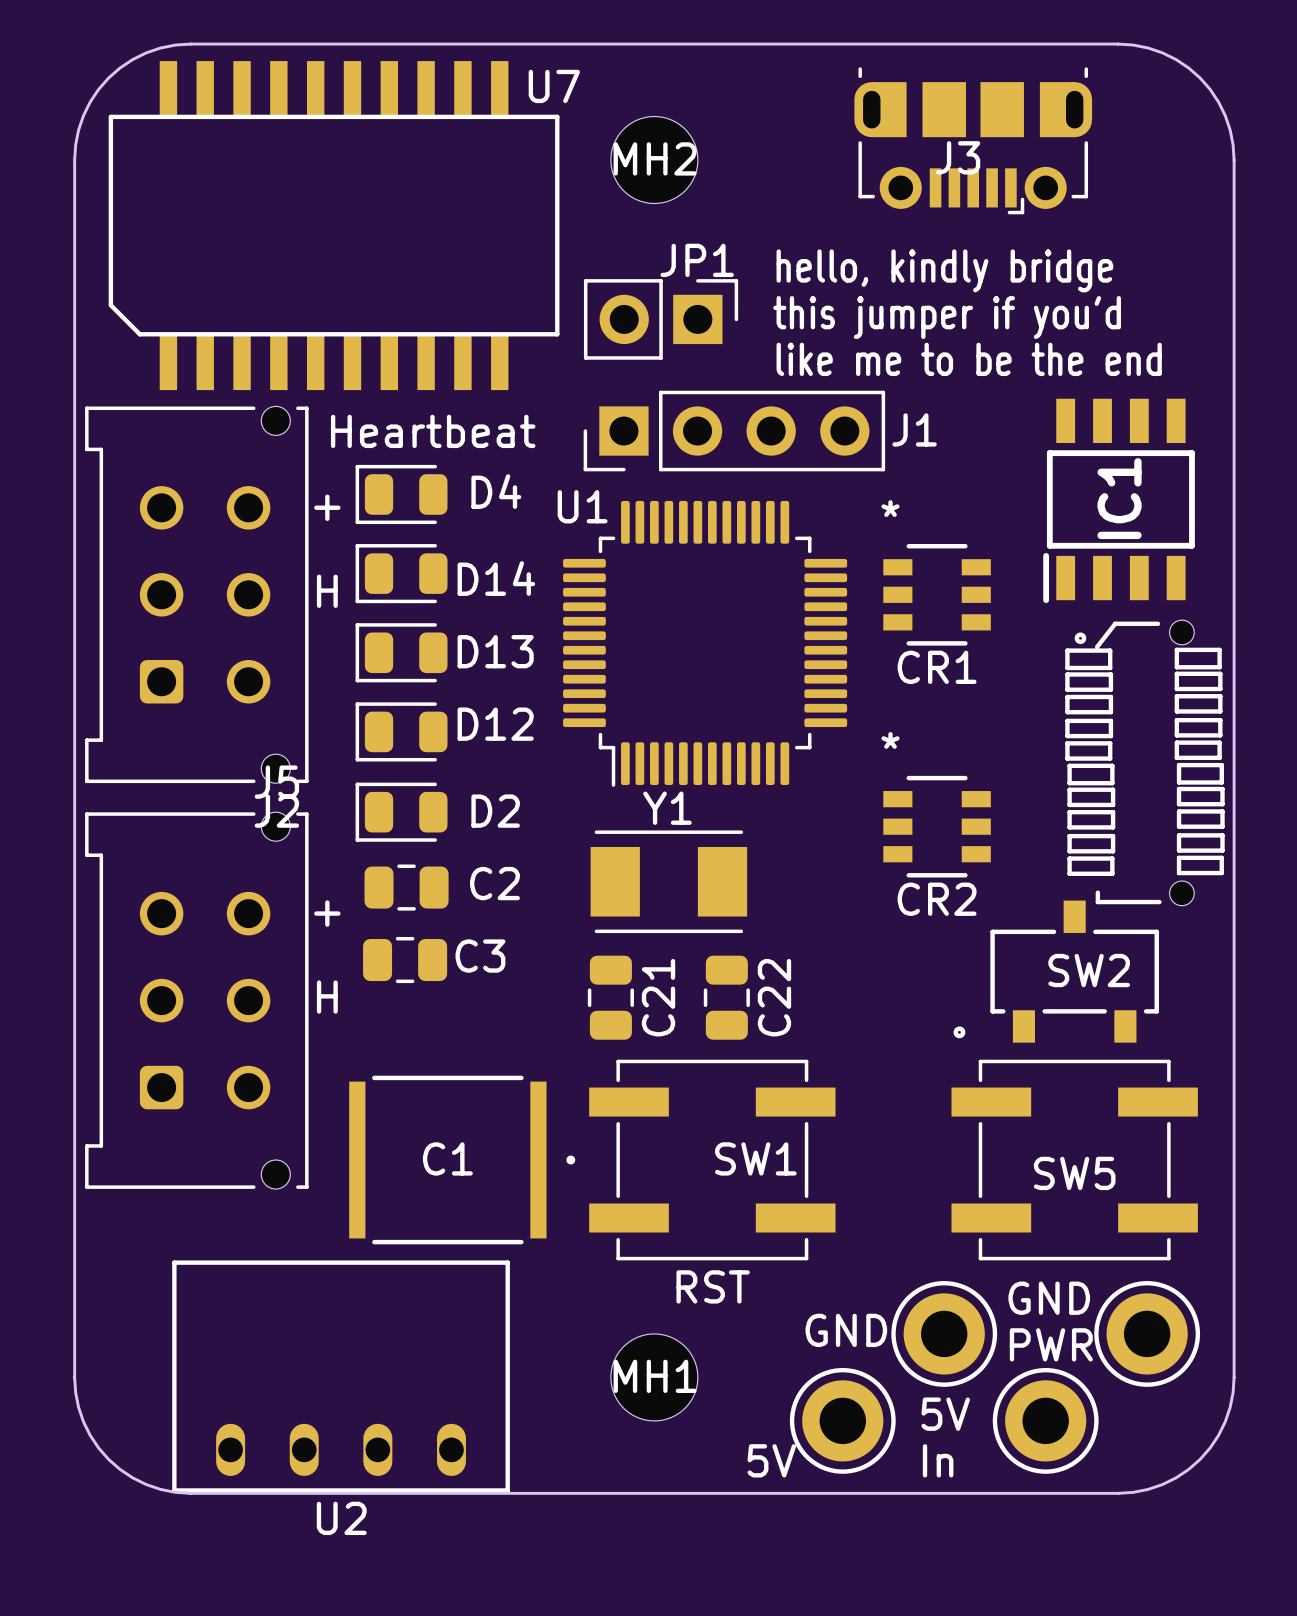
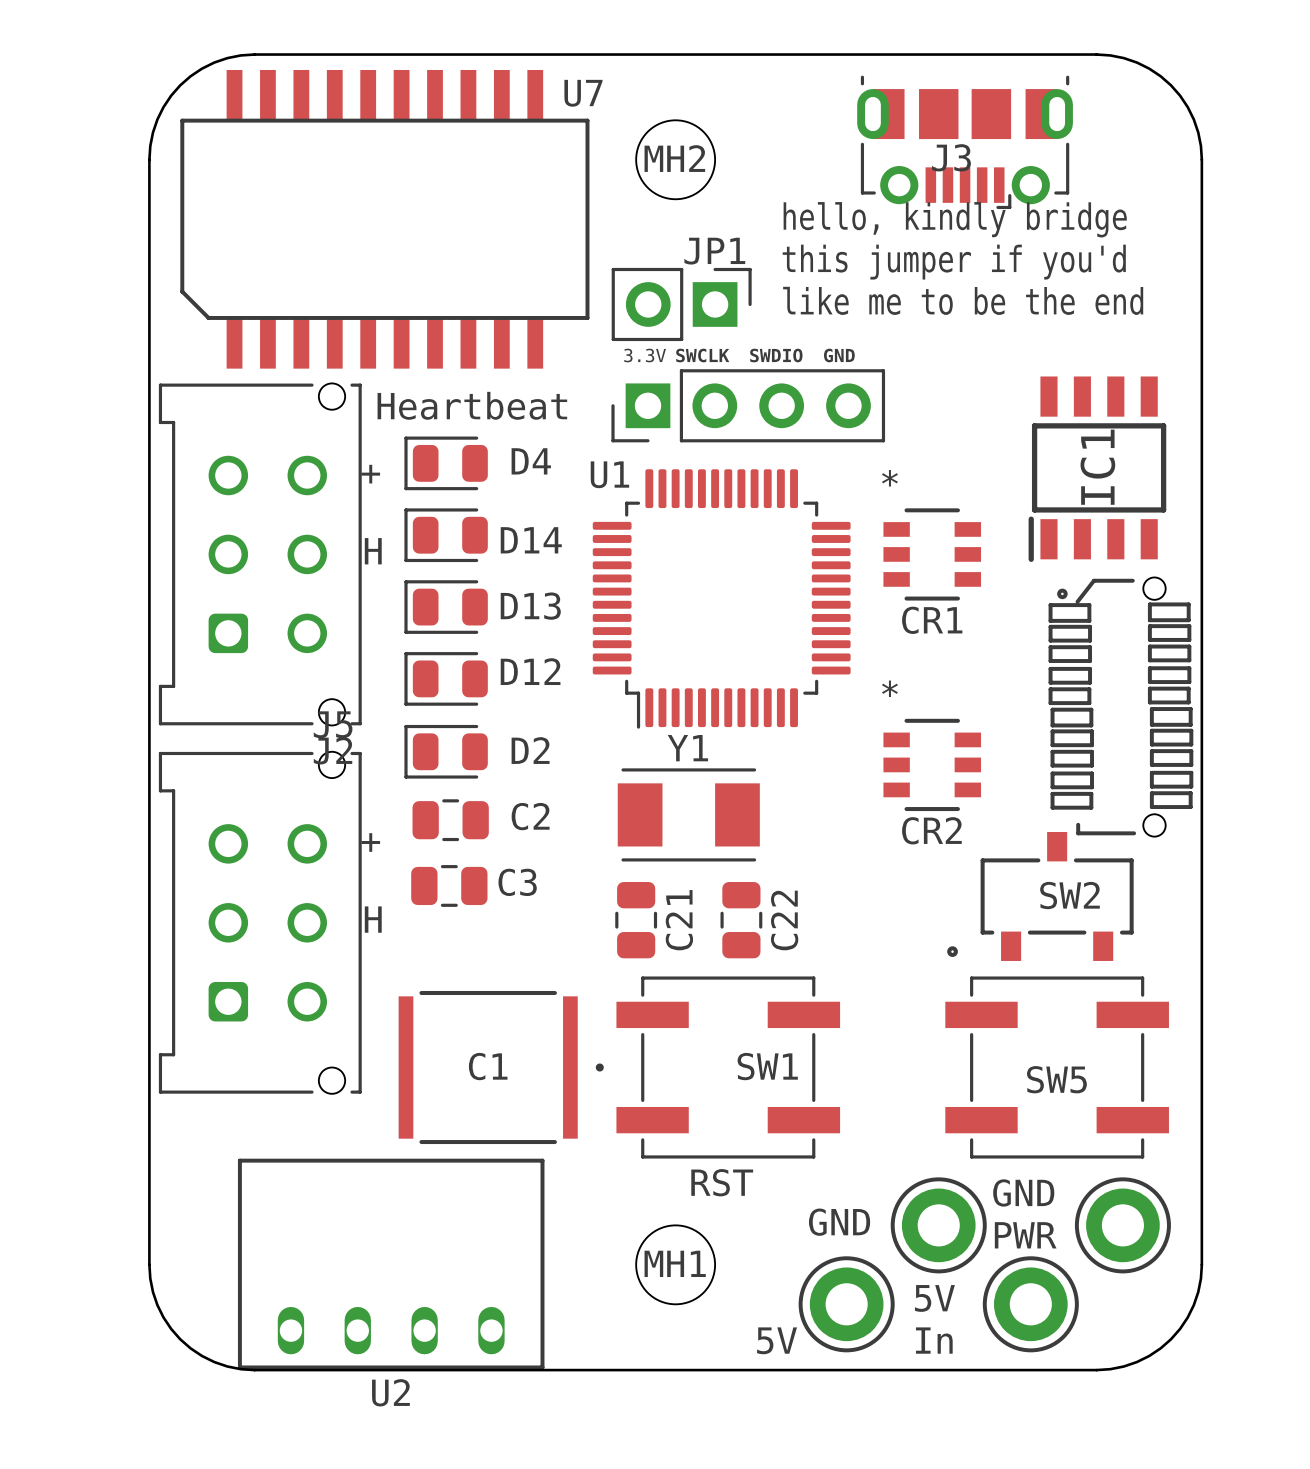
text: none -> hello, kindly bridge (955, 219)
text: hello, kindly bridge (944, 270) -> this jumper if you'd (954, 262)
text: this jumper if you'd (947, 317) -> like me to be the end (963, 300)
text: like me to be the end (969, 359) -> none
text: none -> 3.3V (645, 355)
text: none -> SWCLK (702, 355)
text: none -> SWDIO (776, 355)
text: none -> GND (839, 355)
J1 name: J1 (914, 429) -> none

